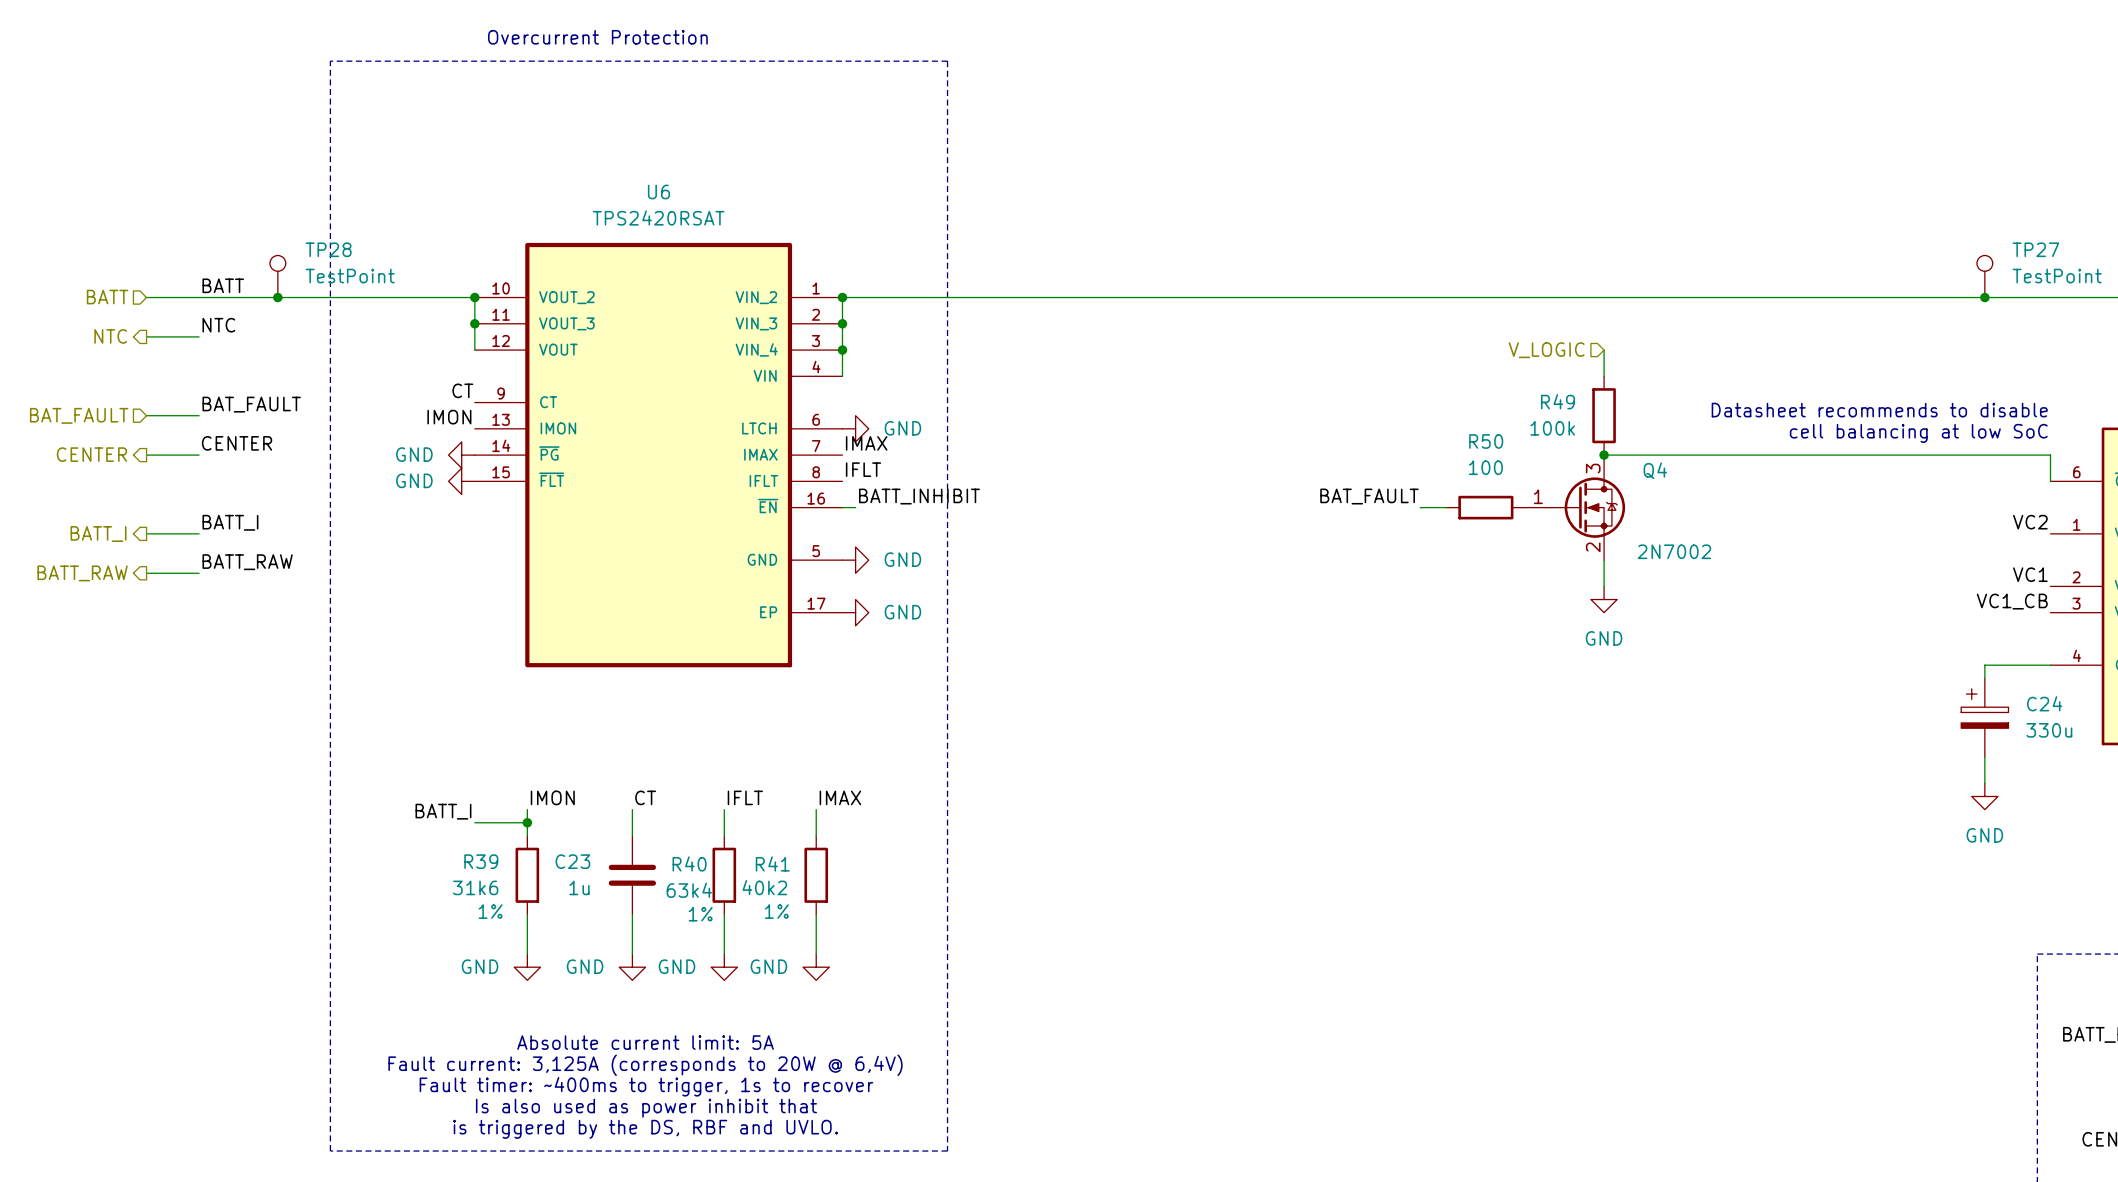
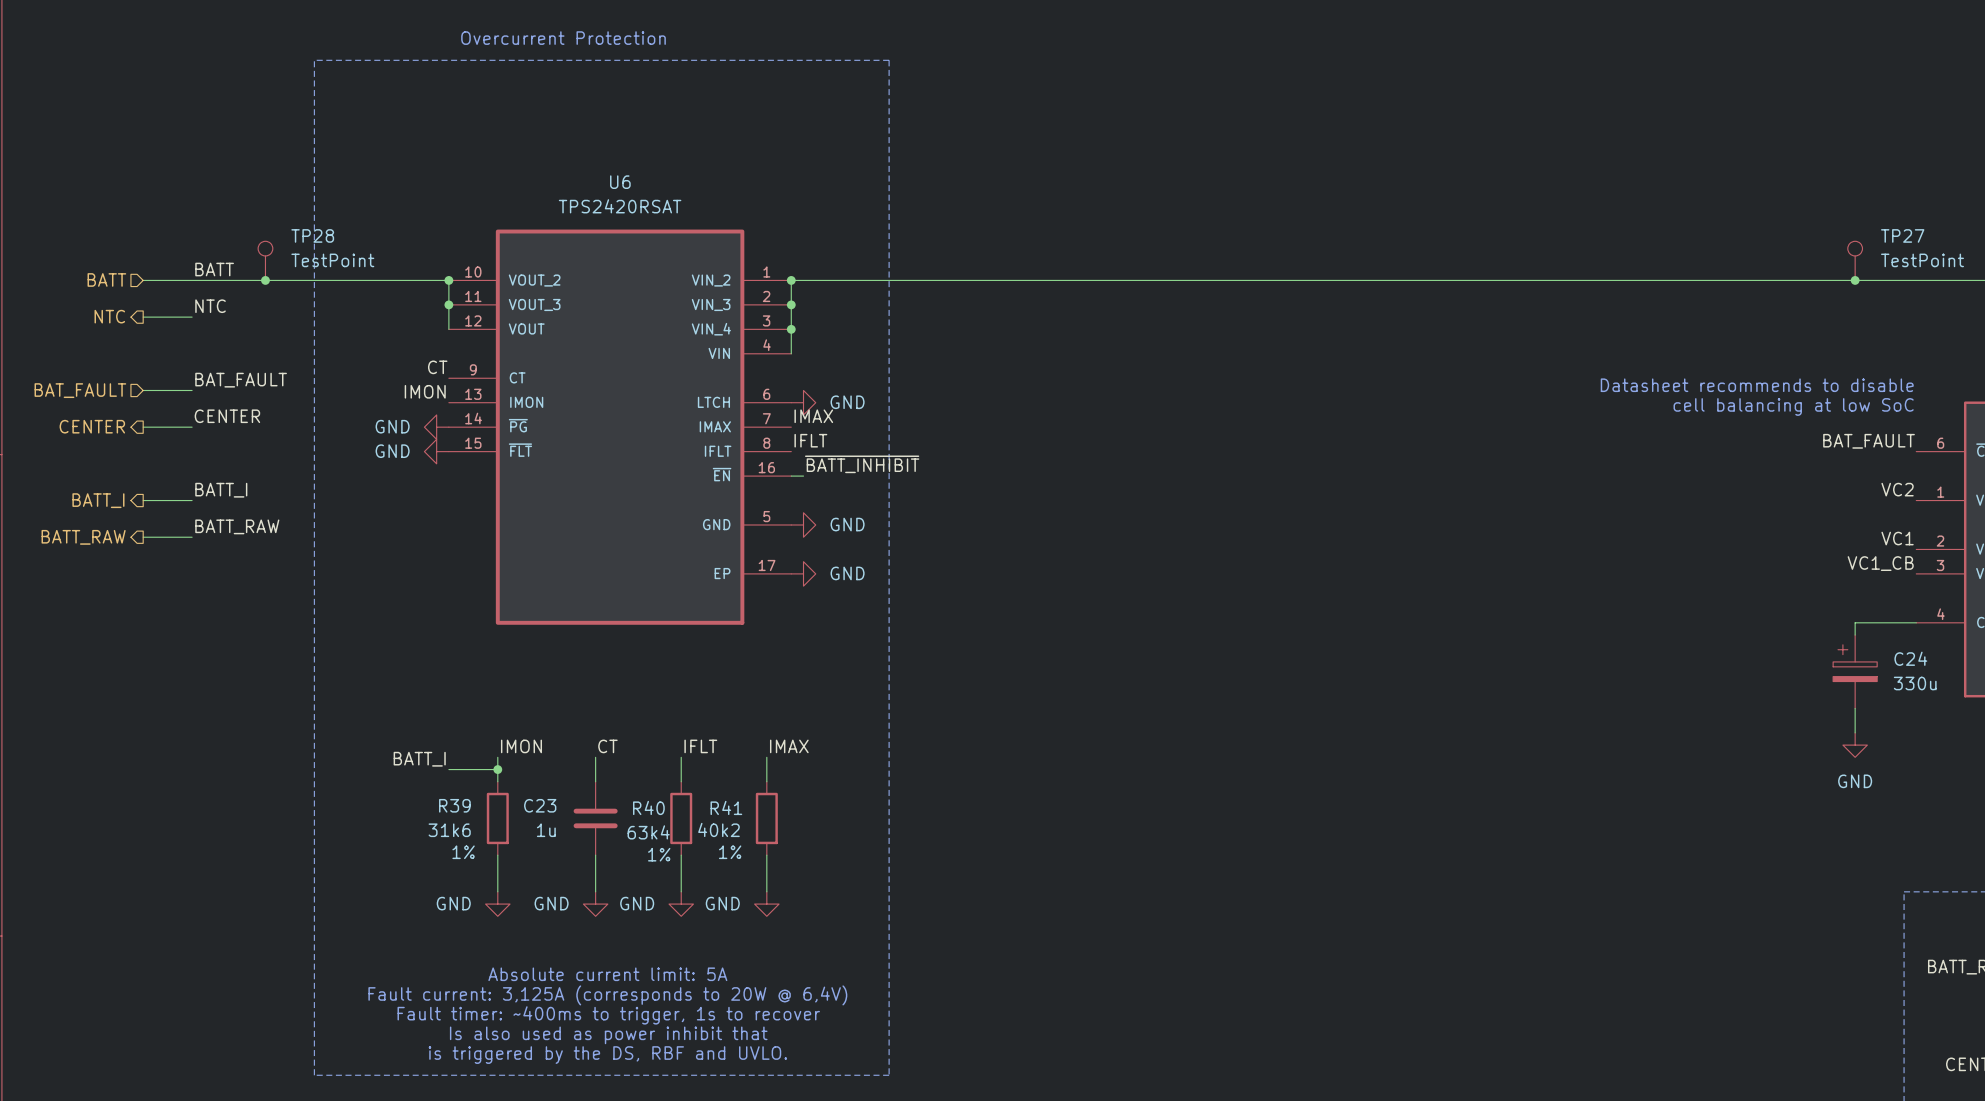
hierarchical label: V_LOGIC (1546, 350) -> none
wire: (1604, 350) (1604, 376) -> none
R49: 100k (1604, 415) -> none
wire: (1604, 455) (2050, 455) (2050, 481) -> none
junction: (1604, 455) -> none
label: none -> BAT_FAULT (1869, 441)
label: BATT_INHIBIT (919, 496) -> ~{BATT_INHIBIT} (862, 464)
label: BAT_FAULT (1369, 496) -> none
wire: (1420, 507) (1446, 507) -> none
R50: 100 (1485, 507) -> none
Q4: 2N7002 (1575, 507) -> none
wire: (1604, 560) (1604, 586) -> none
power symbol: GND (1604, 599) -> none

